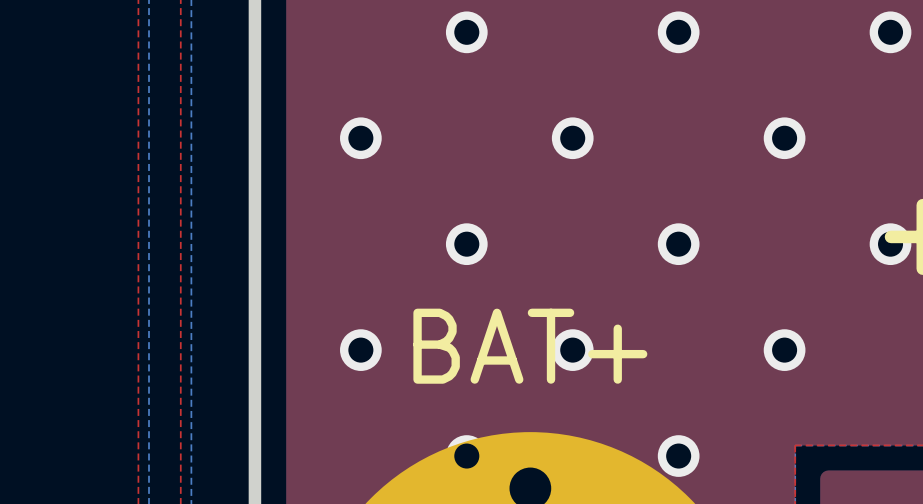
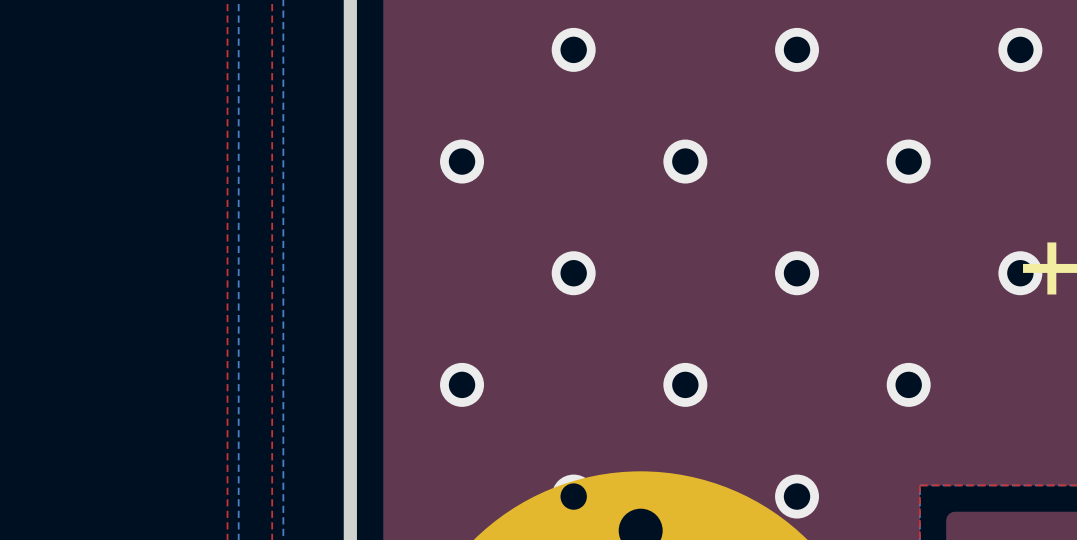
part value: BAT+ (530, 346) -> none

